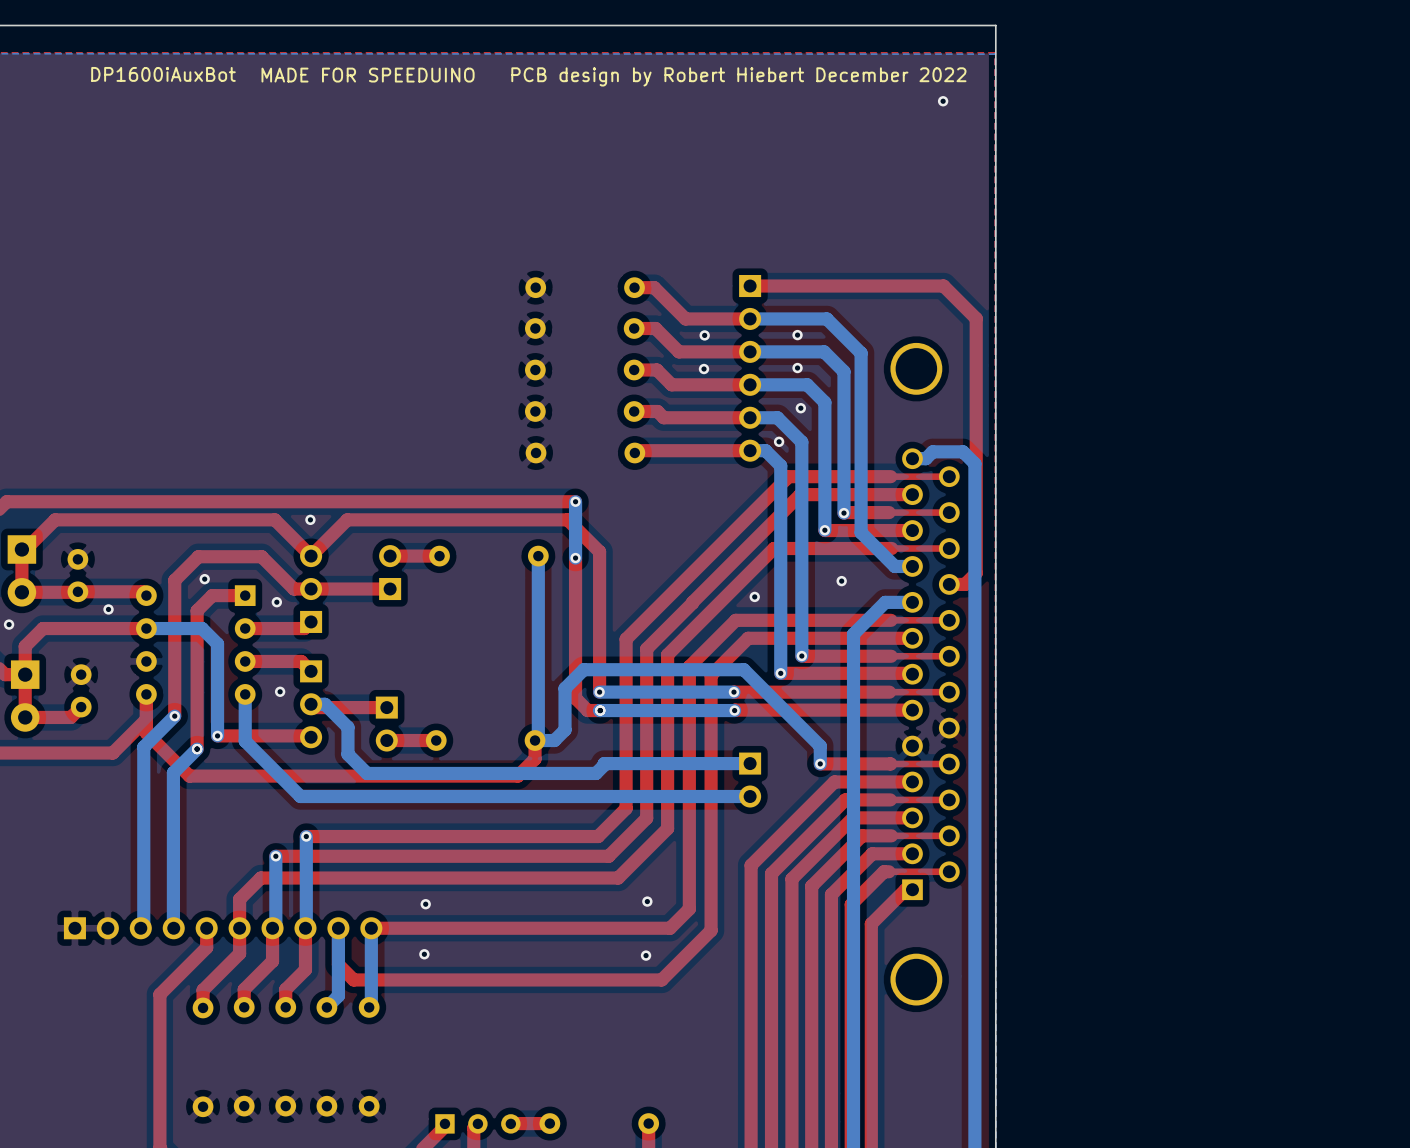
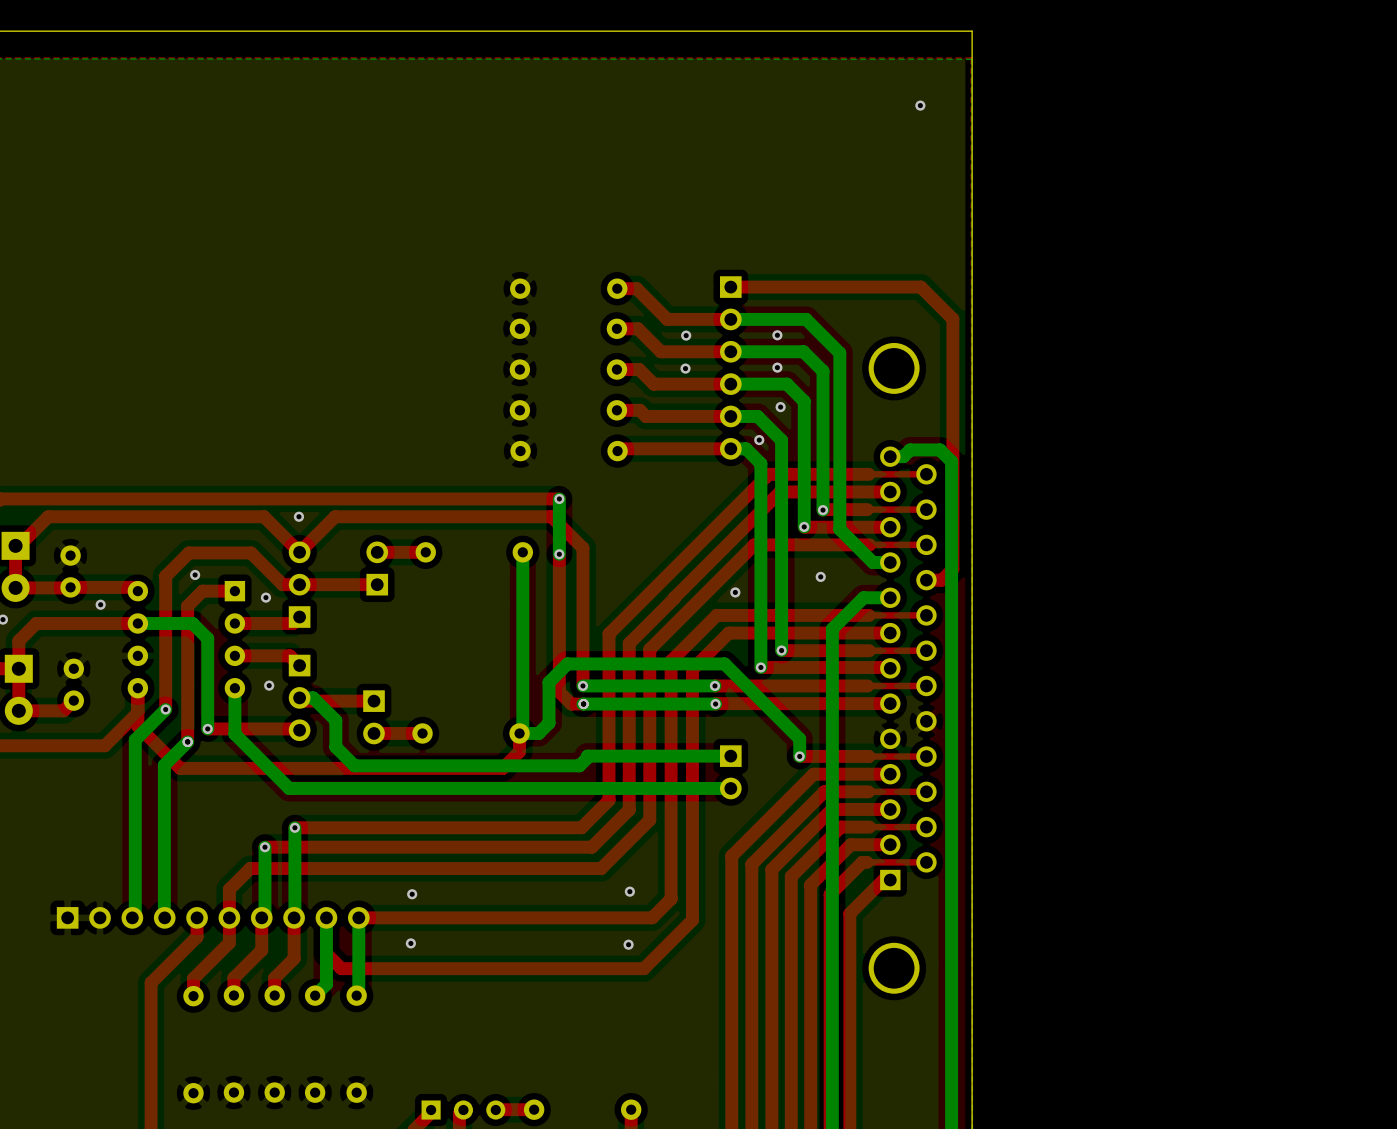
text: DP1600iAuxBot (163, 74) -> none
text: MADE FOR SPEEDUINO (368, 75) -> none
text: PCB design by Robert Hiebert December 2022 (738, 76) -> none

